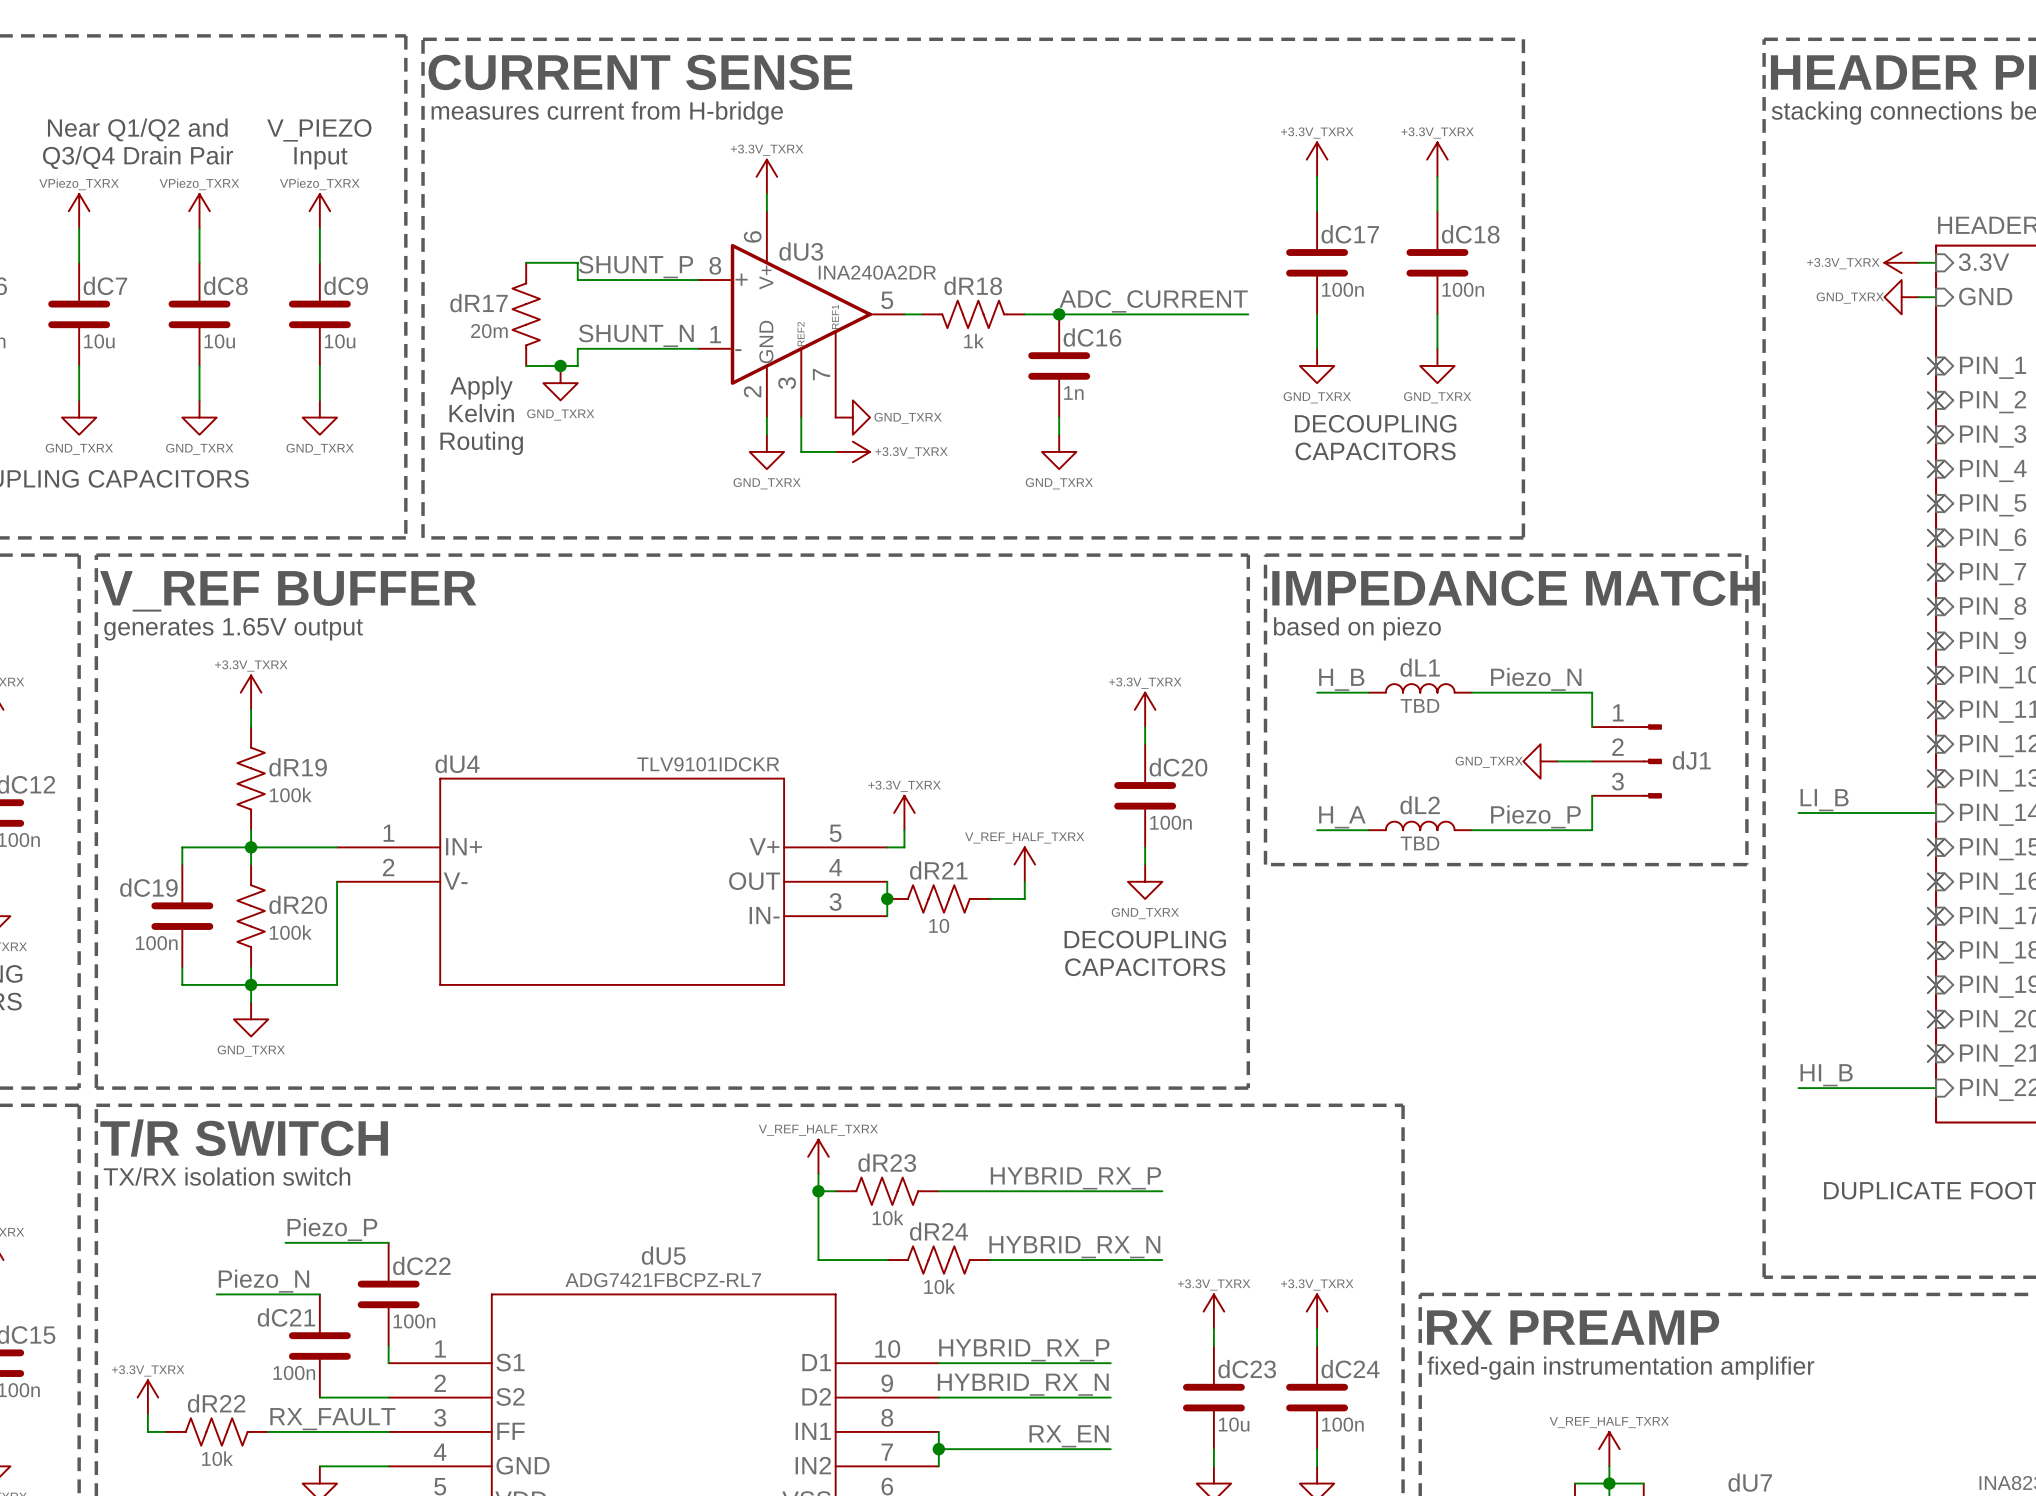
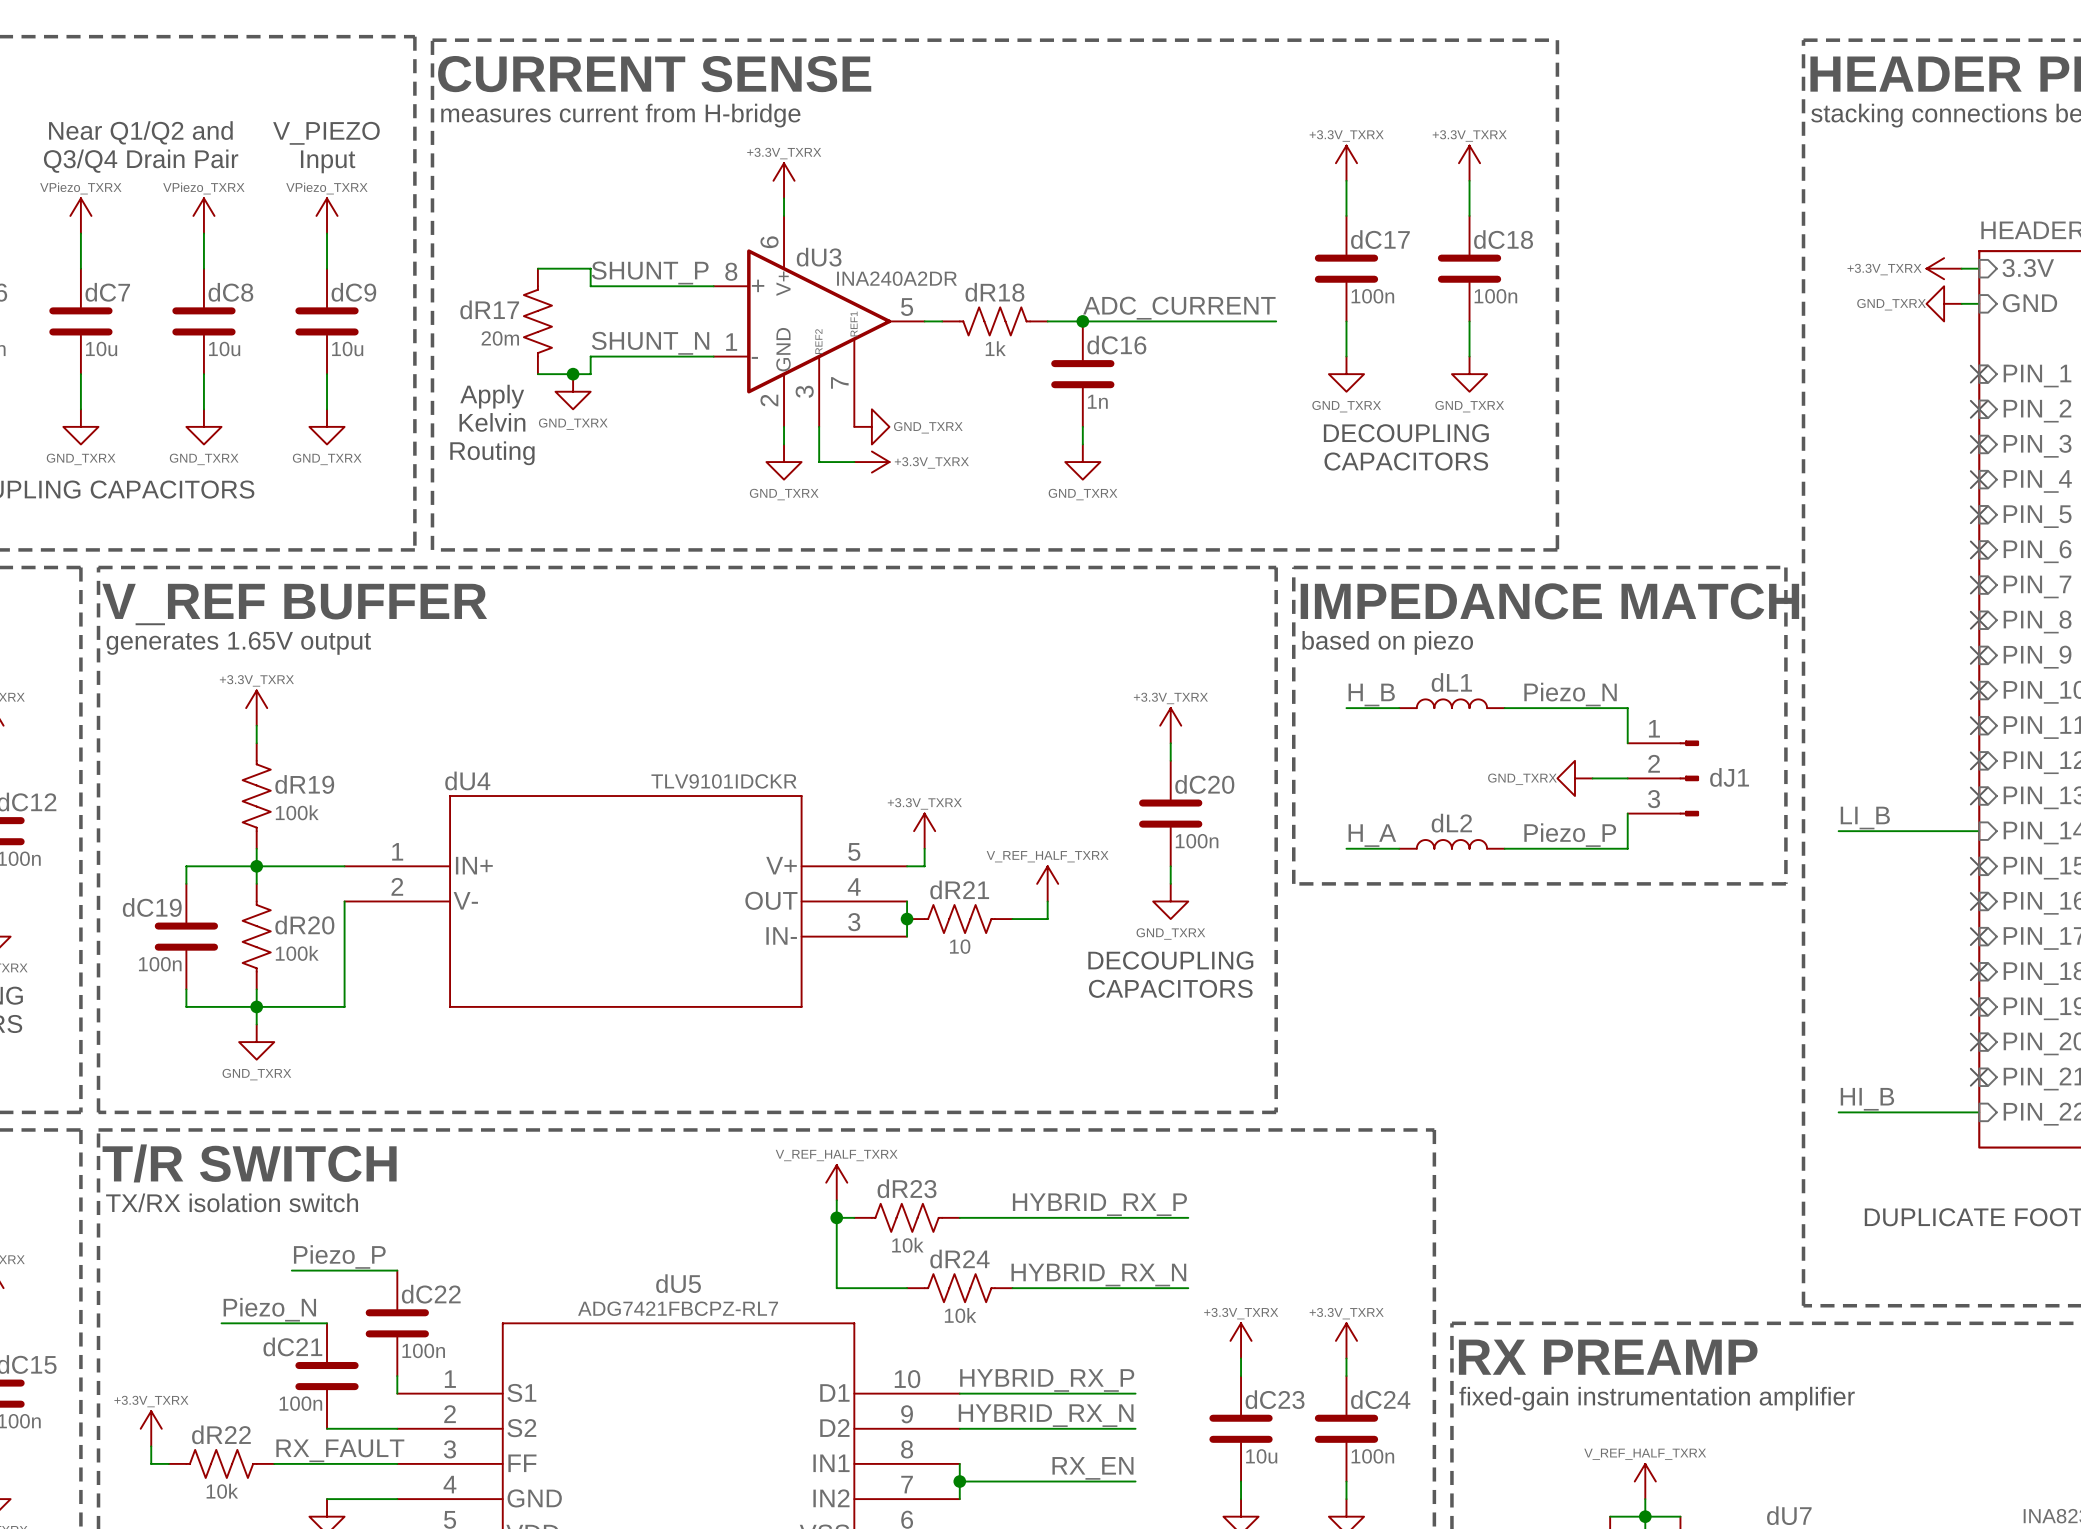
dL1 value: TBD (1419, 705) -> none
dL2 value: TBD (1419, 843) -> none

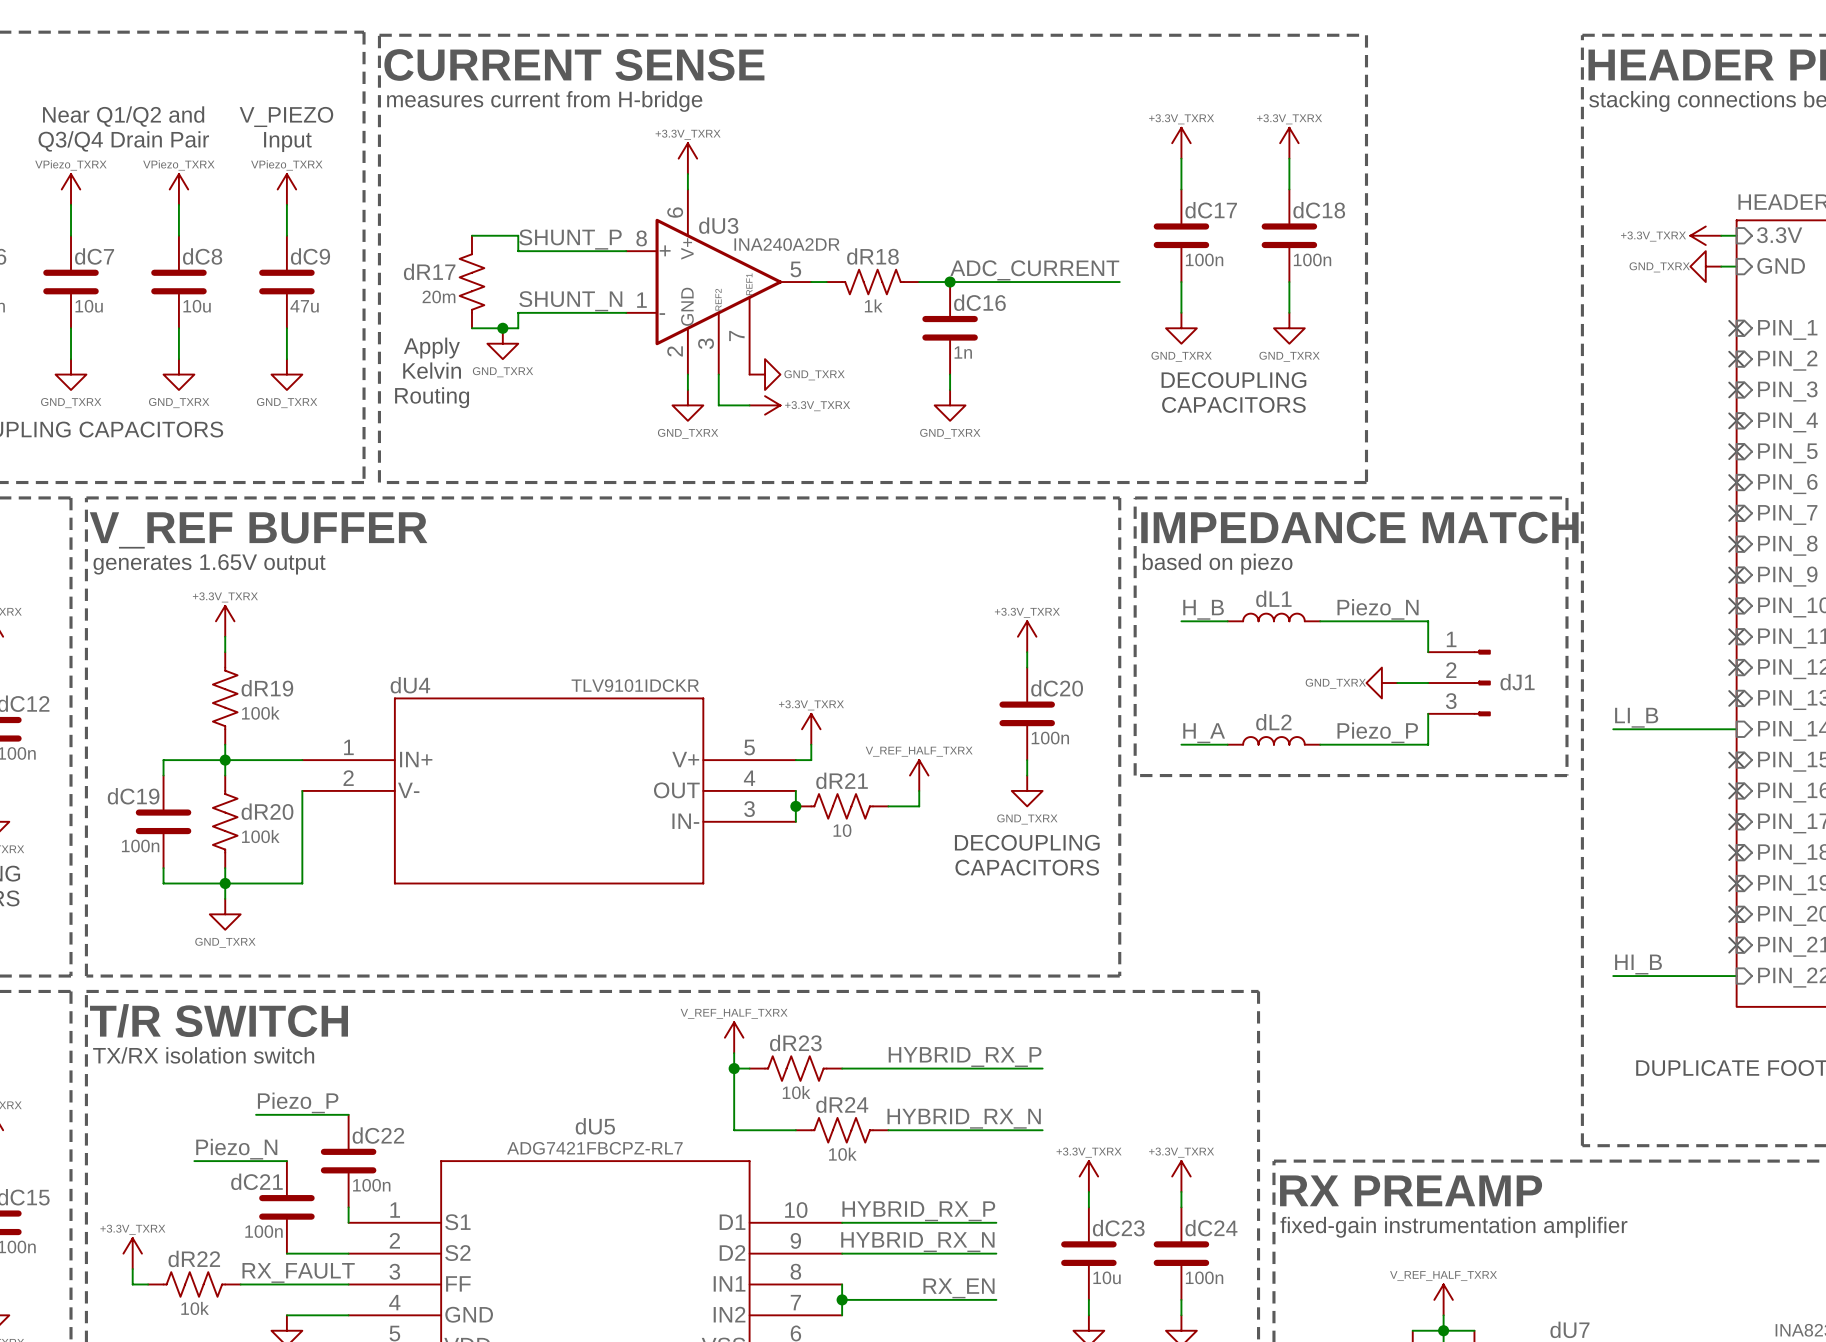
dC9 value: 10u (347, 349) -> 47u (304, 306)

